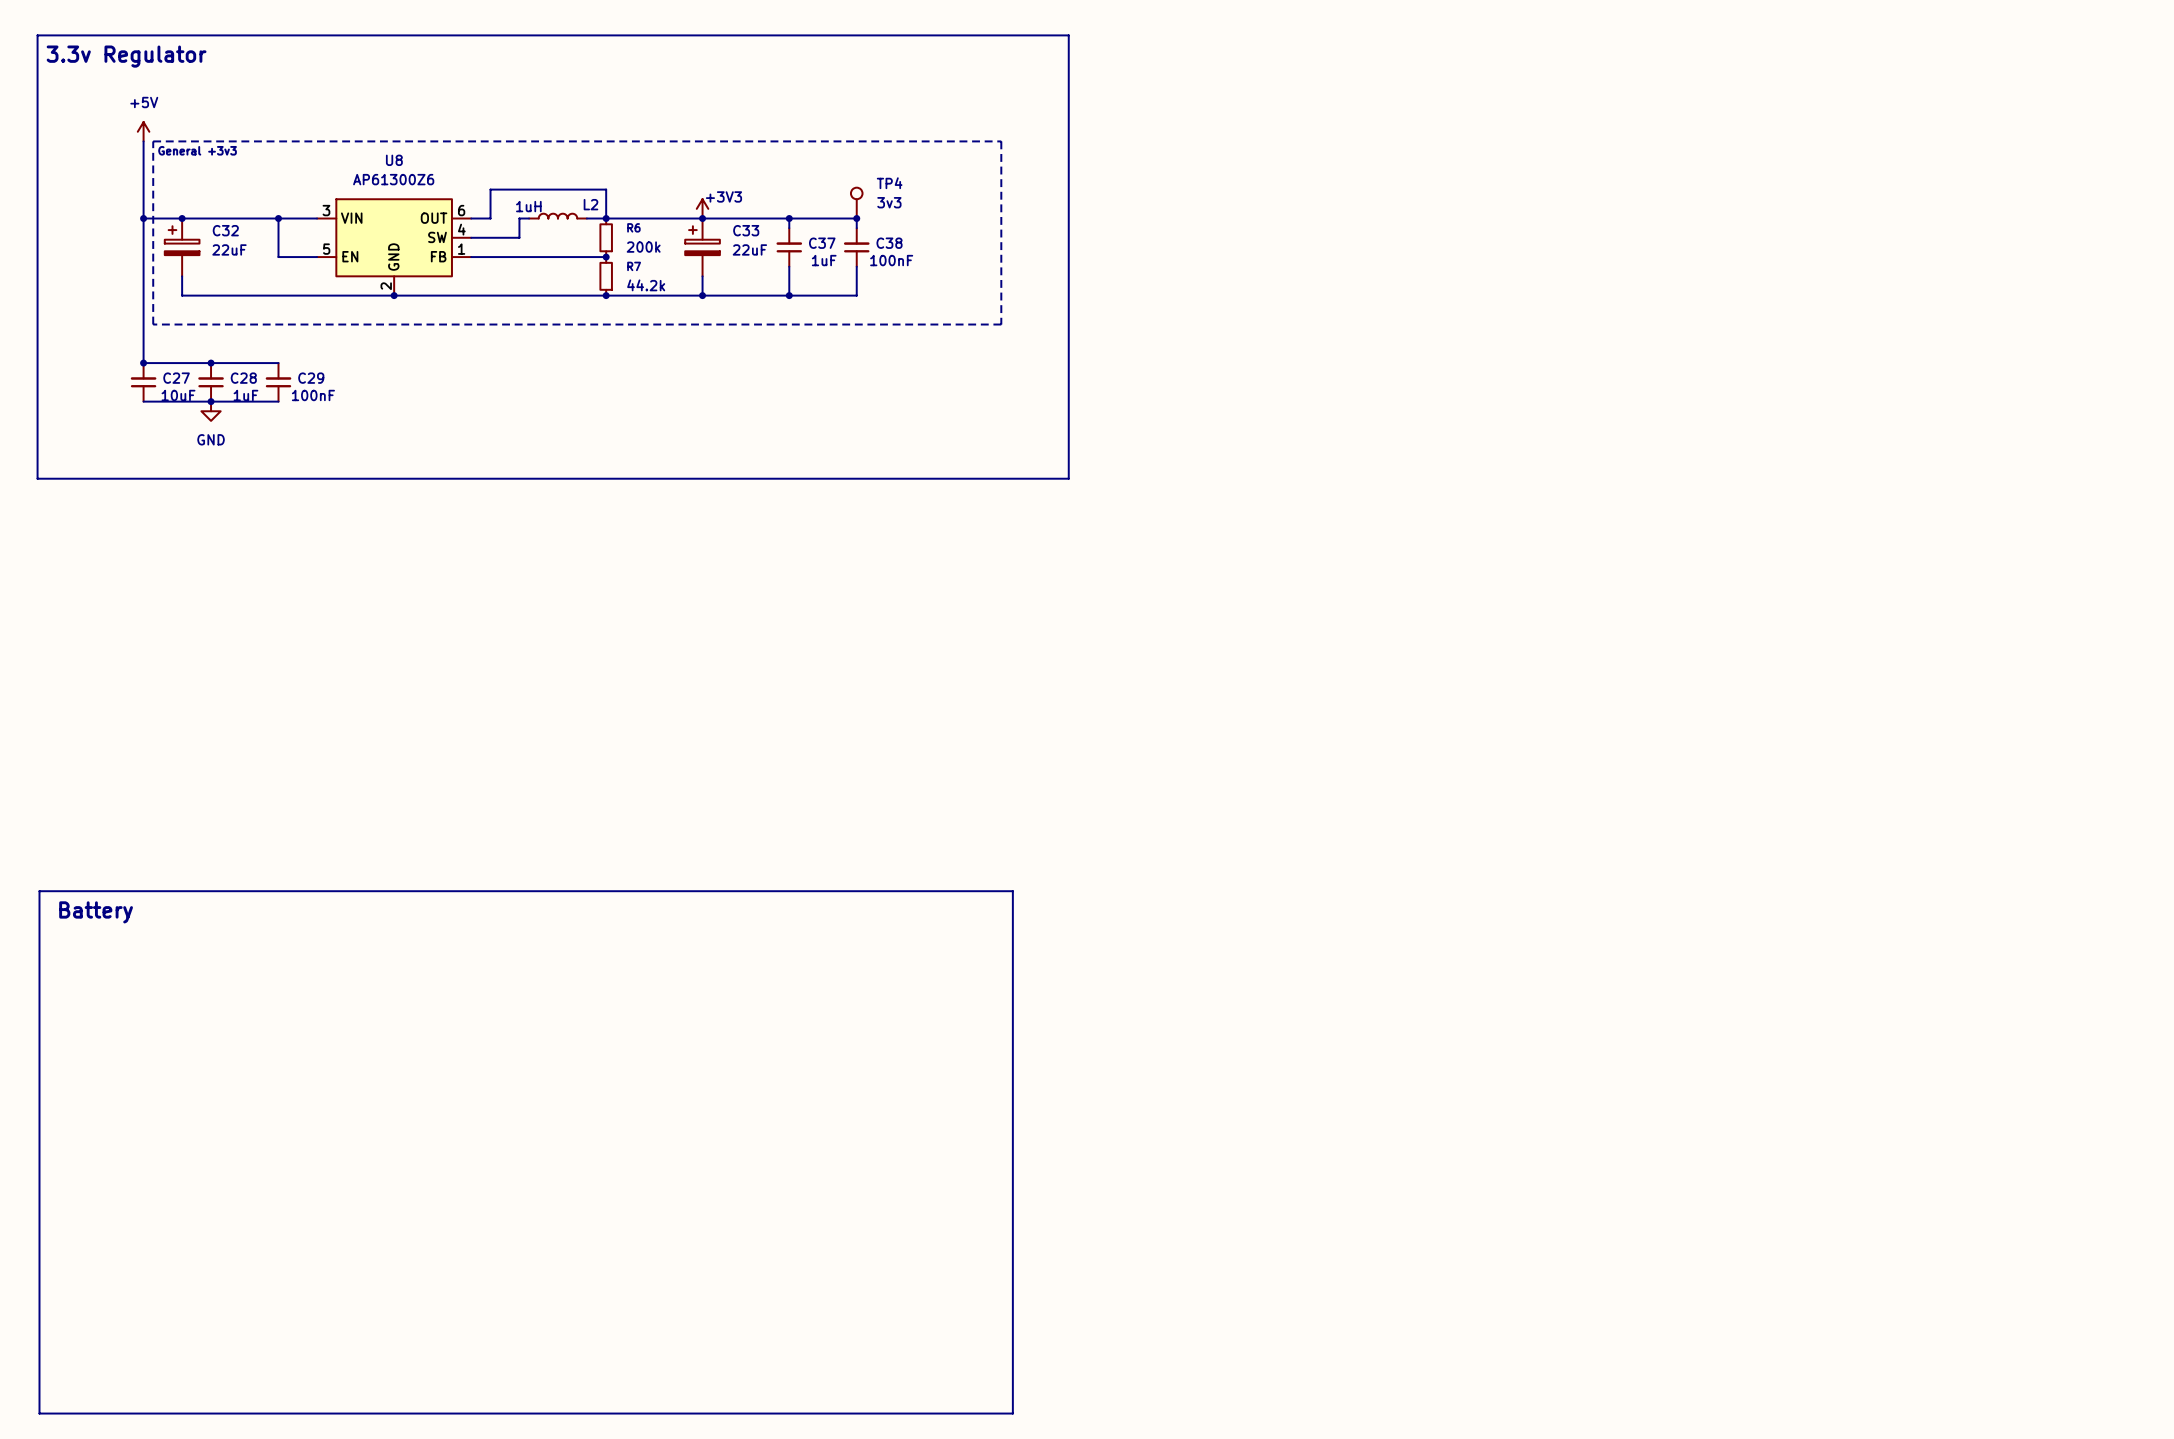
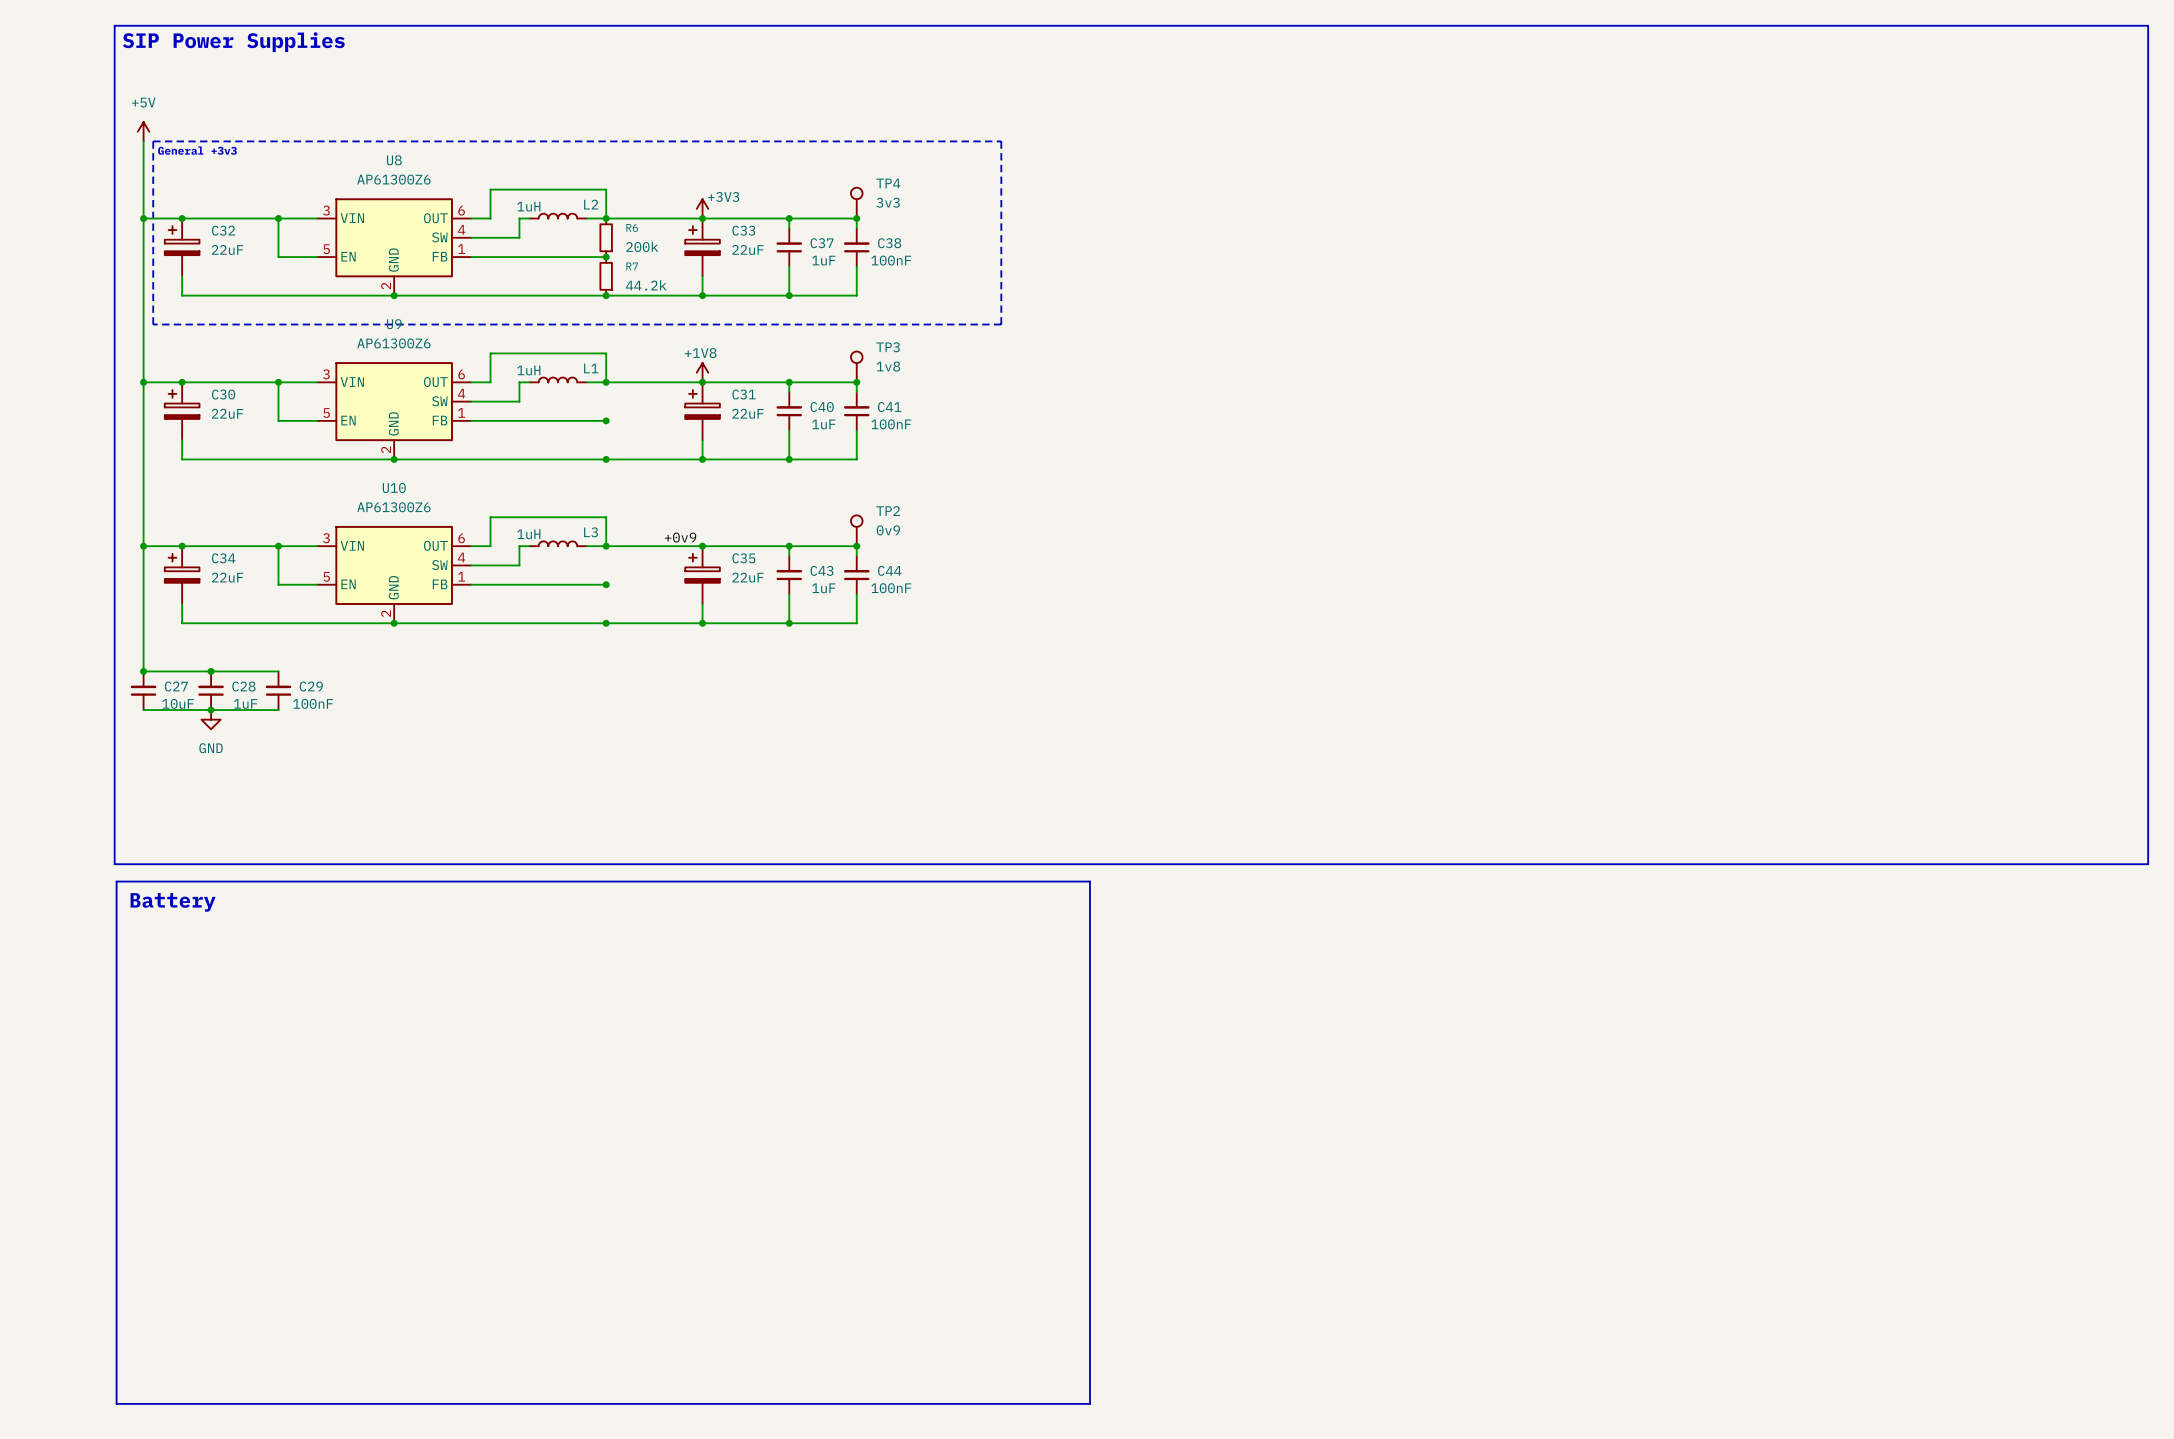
line: none -> (114, 25) (2148, 25) (2148, 864) (114, 864) (114, 25)
line: (37, 35) (1068, 35) (1068, 478) (37, 478) (37, 35) -> none
text: none -> SIP Power Supplies (233, 42)
text: 3.3v Regulator (126, 56) -> none
wire: (143, 363) (278, 363) -> (143, 363) (143, 671) (278, 671)
junction position: (143, 363) -> (143, 382)
junction: (211, 363) -> none
TP3: none -> 1v8 (856, 366)
power symbol: none -> +1V8 (702, 372)
L1: none -> 1uH (557, 379)
wire: none -> (143, 382) (317, 382)
C27 position: (143, 382) -> (143, 690)
junction: none -> (182, 382)
C28 position: (211, 382) -> (211, 690)
wire: none -> (278, 382) (278, 420) (317, 420)
junction: none -> (278, 382)
C29 position: (278, 382) -> (278, 690)
wire: none -> (471, 382) (490, 382) (490, 353) (606, 353) (606, 382)
wire: none -> (529, 382) (519, 382) (519, 401) (471, 401)
wire: none -> (586, 382) (856, 382) (856, 391)
junction: none -> (606, 382)
junction: none -> (702, 382)
wire: none -> (789, 382) (789, 391)
junction: none -> (789, 382)
junction: none -> (856, 382)
wire: (143, 401) (278, 401) -> none
junction: (211, 401) -> none
U9: none -> AP61300Z6 (394, 410)
C30: none -> 22uF (182, 411)
power symbol: GND (211, 411) -> none
C31: none -> 22uF (702, 411)
C40: none -> 1uF (789, 411)
C41: none -> 100nF (856, 411)
wire: none -> (471, 420) (606, 420)
junction: none -> (606, 420)
wire: none -> (789, 430) (789, 459)
wire: none -> (856, 430) (856, 459) (182, 459) (182, 440)
wire: none -> (702, 440) (702, 459)
junction: none -> (394, 459)
junction: none -> (606, 459)
junction: none -> (702, 459)
junction: none -> (789, 459)
TP2: none -> 0v9 (856, 530)
label: none -> +0v9 (680, 537)
L3: none -> 1uH (557, 543)
wire: none -> (143, 546) (317, 546)
junction: none -> (143, 546)
junction: none -> (182, 546)
wire: none -> (278, 546) (278, 584) (317, 584)
junction: none -> (278, 546)
wire: none -> (471, 546) (490, 546) (490, 517) (606, 517) (606, 546)
wire: none -> (529, 546) (519, 546) (519, 565) (471, 565)
wire: none -> (586, 546) (856, 546) (856, 555)
junction: none -> (606, 546)
junction: none -> (702, 546)
wire: none -> (789, 546) (789, 555)
junction: none -> (789, 546)
junction: none -> (856, 546)
U10: none -> AP61300Z6 (394, 574)
C34: none -> 22uF (182, 575)
C35: none -> 22uF (702, 575)
C43: none -> 1uF (789, 575)
C44: none -> 100nF (856, 575)
wire: none -> (471, 584) (606, 584)
junction: none -> (606, 584)
wire: none -> (789, 594) (789, 623)
wire: none -> (856, 594) (856, 623) (182, 623) (182, 604)
wire: none -> (702, 604) (702, 623)
junction: none -> (394, 623)
junction: none -> (606, 623)
junction: none -> (702, 623)
junction: none -> (789, 623)
junction: none -> (143, 671)
junction: none -> (211, 671)
wire: none -> (143, 710) (278, 710)
junction: none -> (211, 710)
power symbol: none -> GND (211, 719)
line: (39, 891) (1012, 891) (1012, 1413) (39, 1413) (39, 891) -> (116, 881) (1089, 881) (1089, 1403) (116, 1403) (116, 881)
text position: Battery (96, 912) -> Battery (173, 902)

